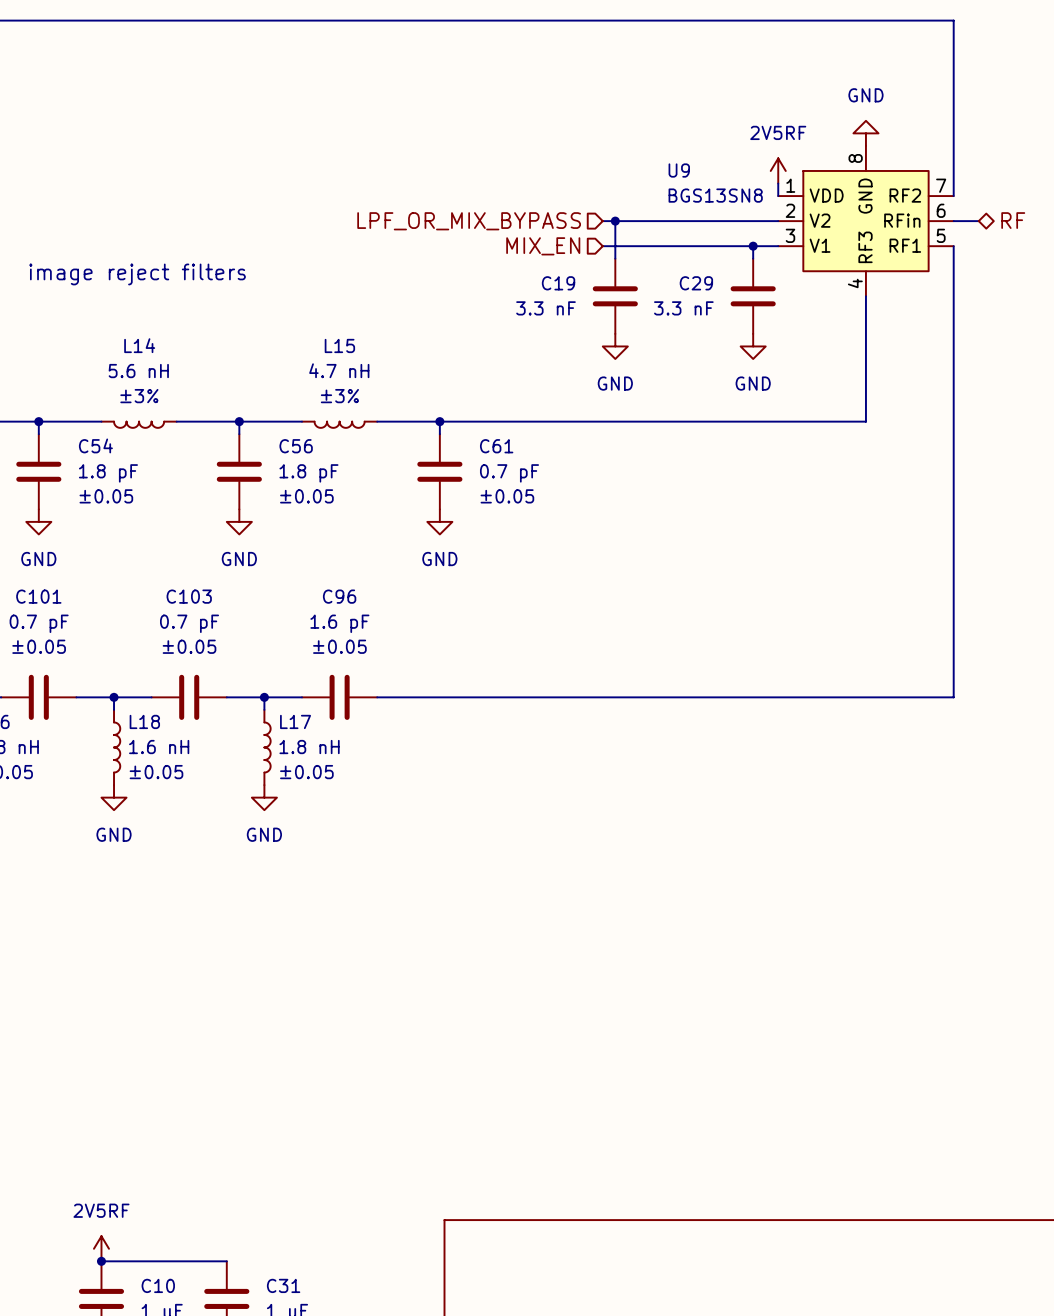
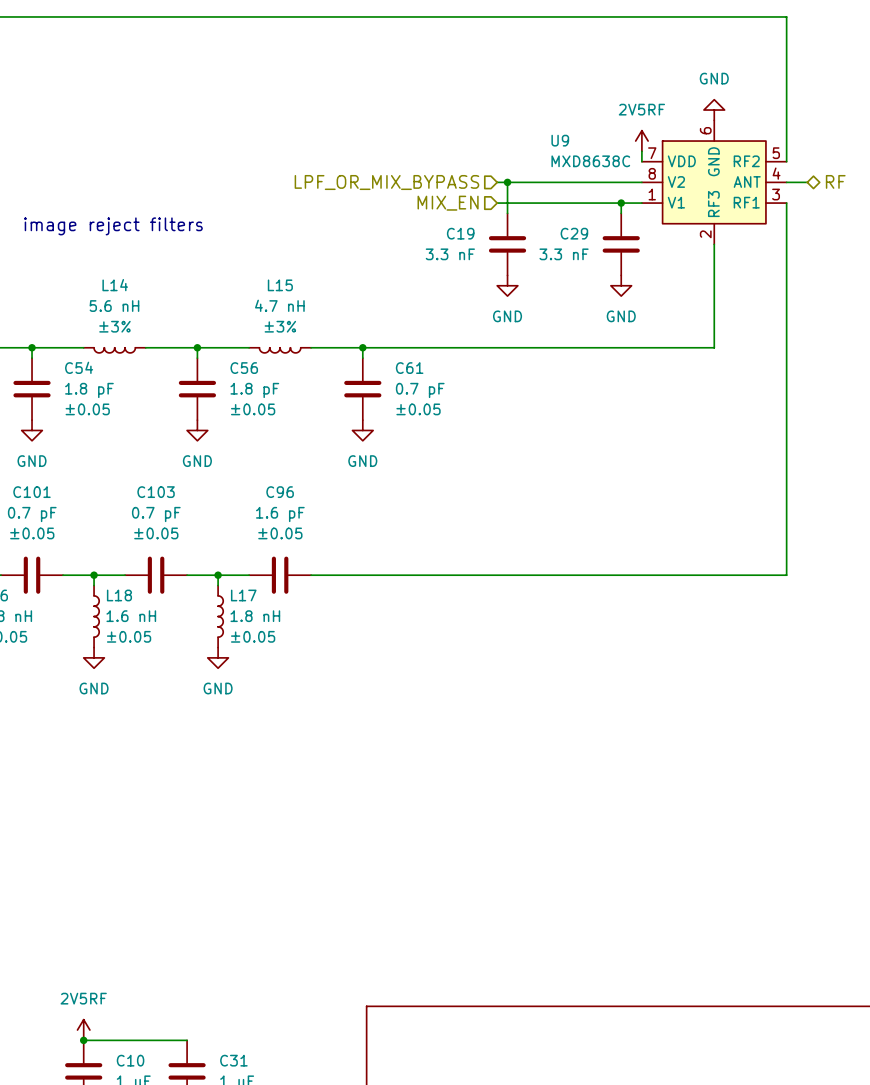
U9 symbol: [778, 145, 954, 297] -> [641, 120, 787, 245]
U9 value: BGS13SN8 (715, 195) -> MXD8638C (590, 161)

